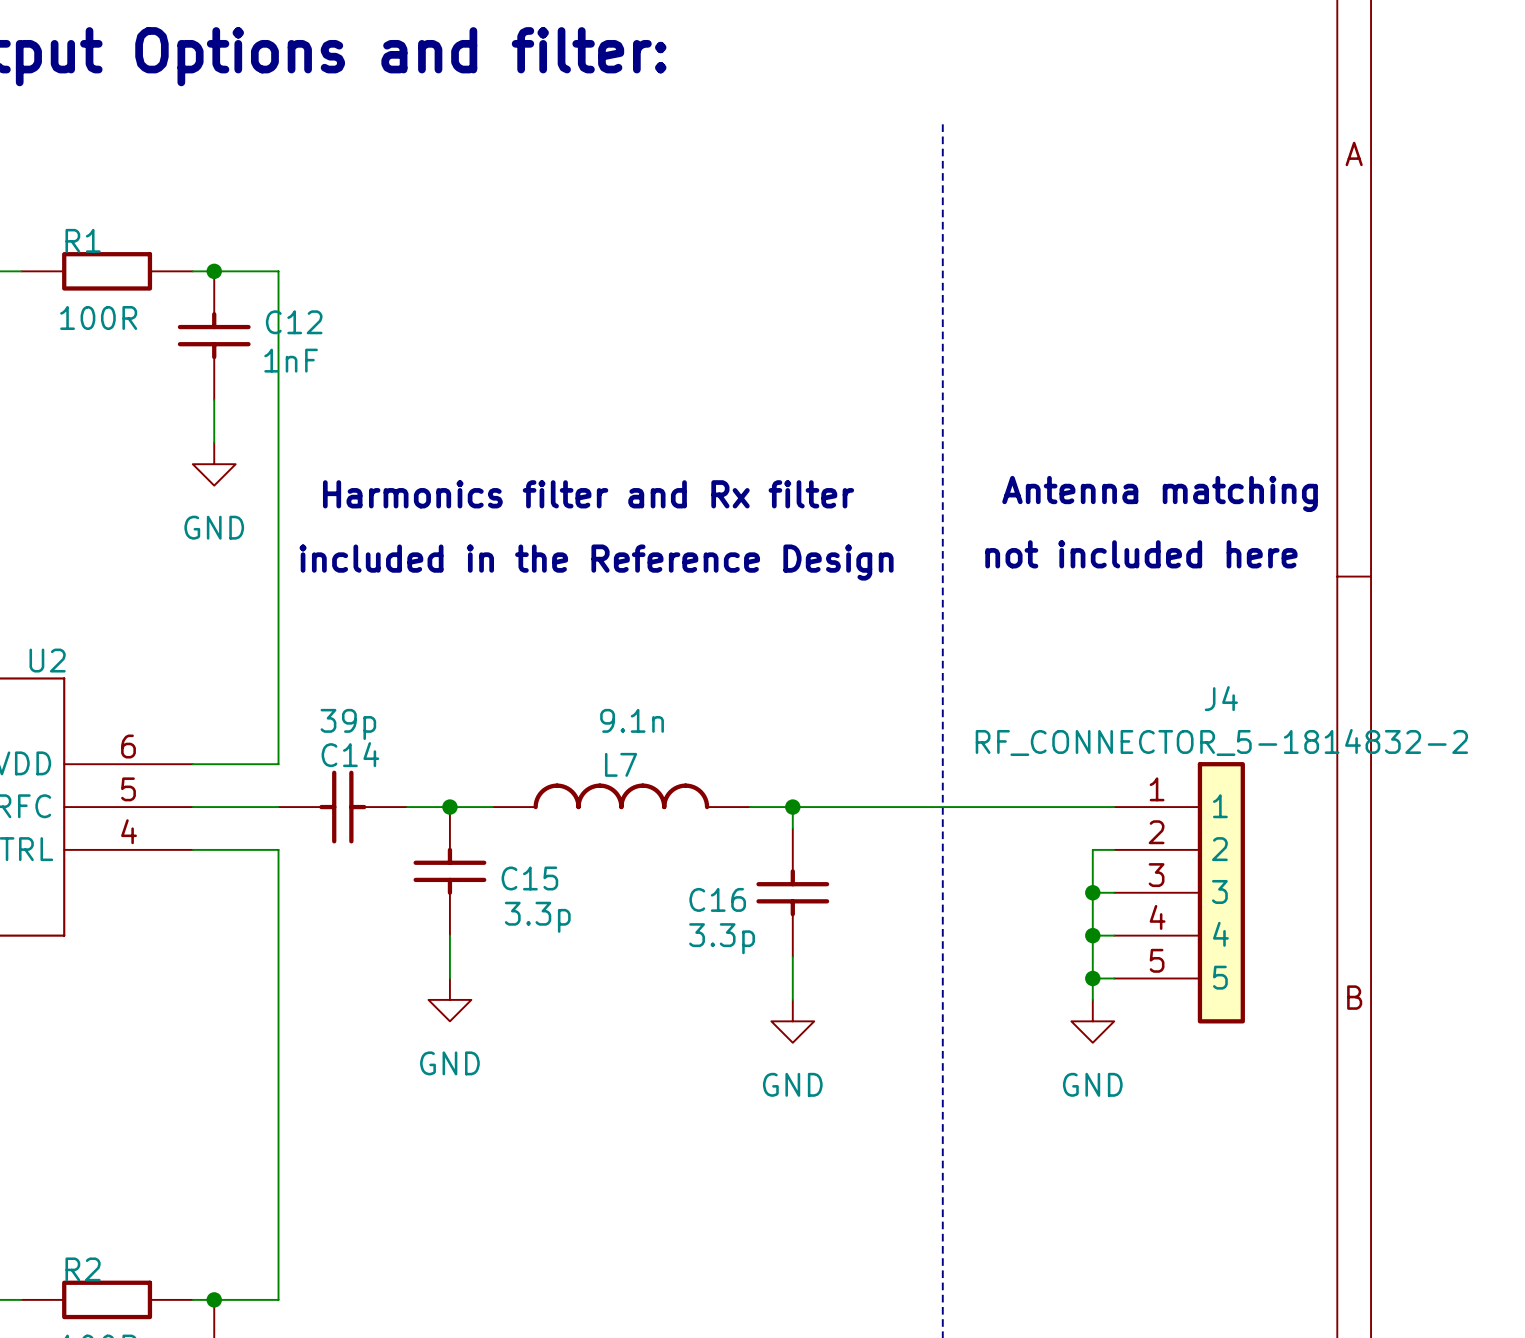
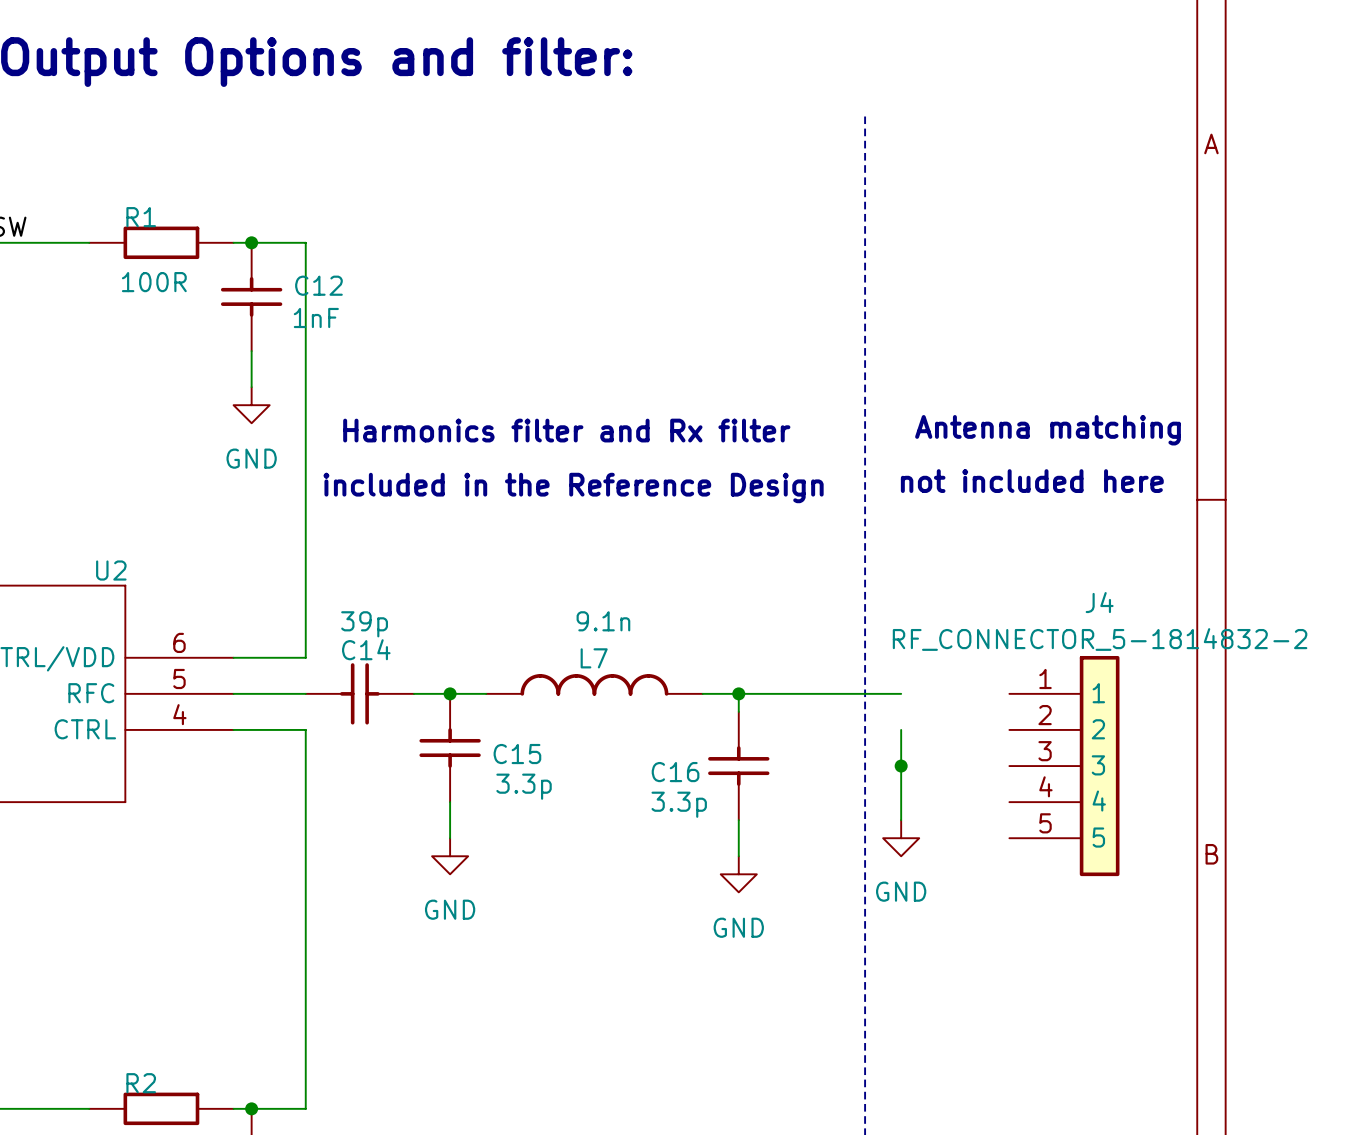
wire: (985, 807) (1114, 807) -> none
wire: none -> (901, 729) (901, 820)
wire: (1114, 849) (1092, 849) (1092, 999) -> none
junction: none -> (901, 766)
wire: (1092, 892) (1114, 892) -> none
junction: (1092, 892) -> none
wire: (1092, 935) (1114, 935) -> none
junction: (1092, 935) -> none
wire: (1092, 978) (1114, 978) -> none
junction: (1092, 978) -> none
power symbol position: GND (1092, 1021) -> GND (901, 838)

